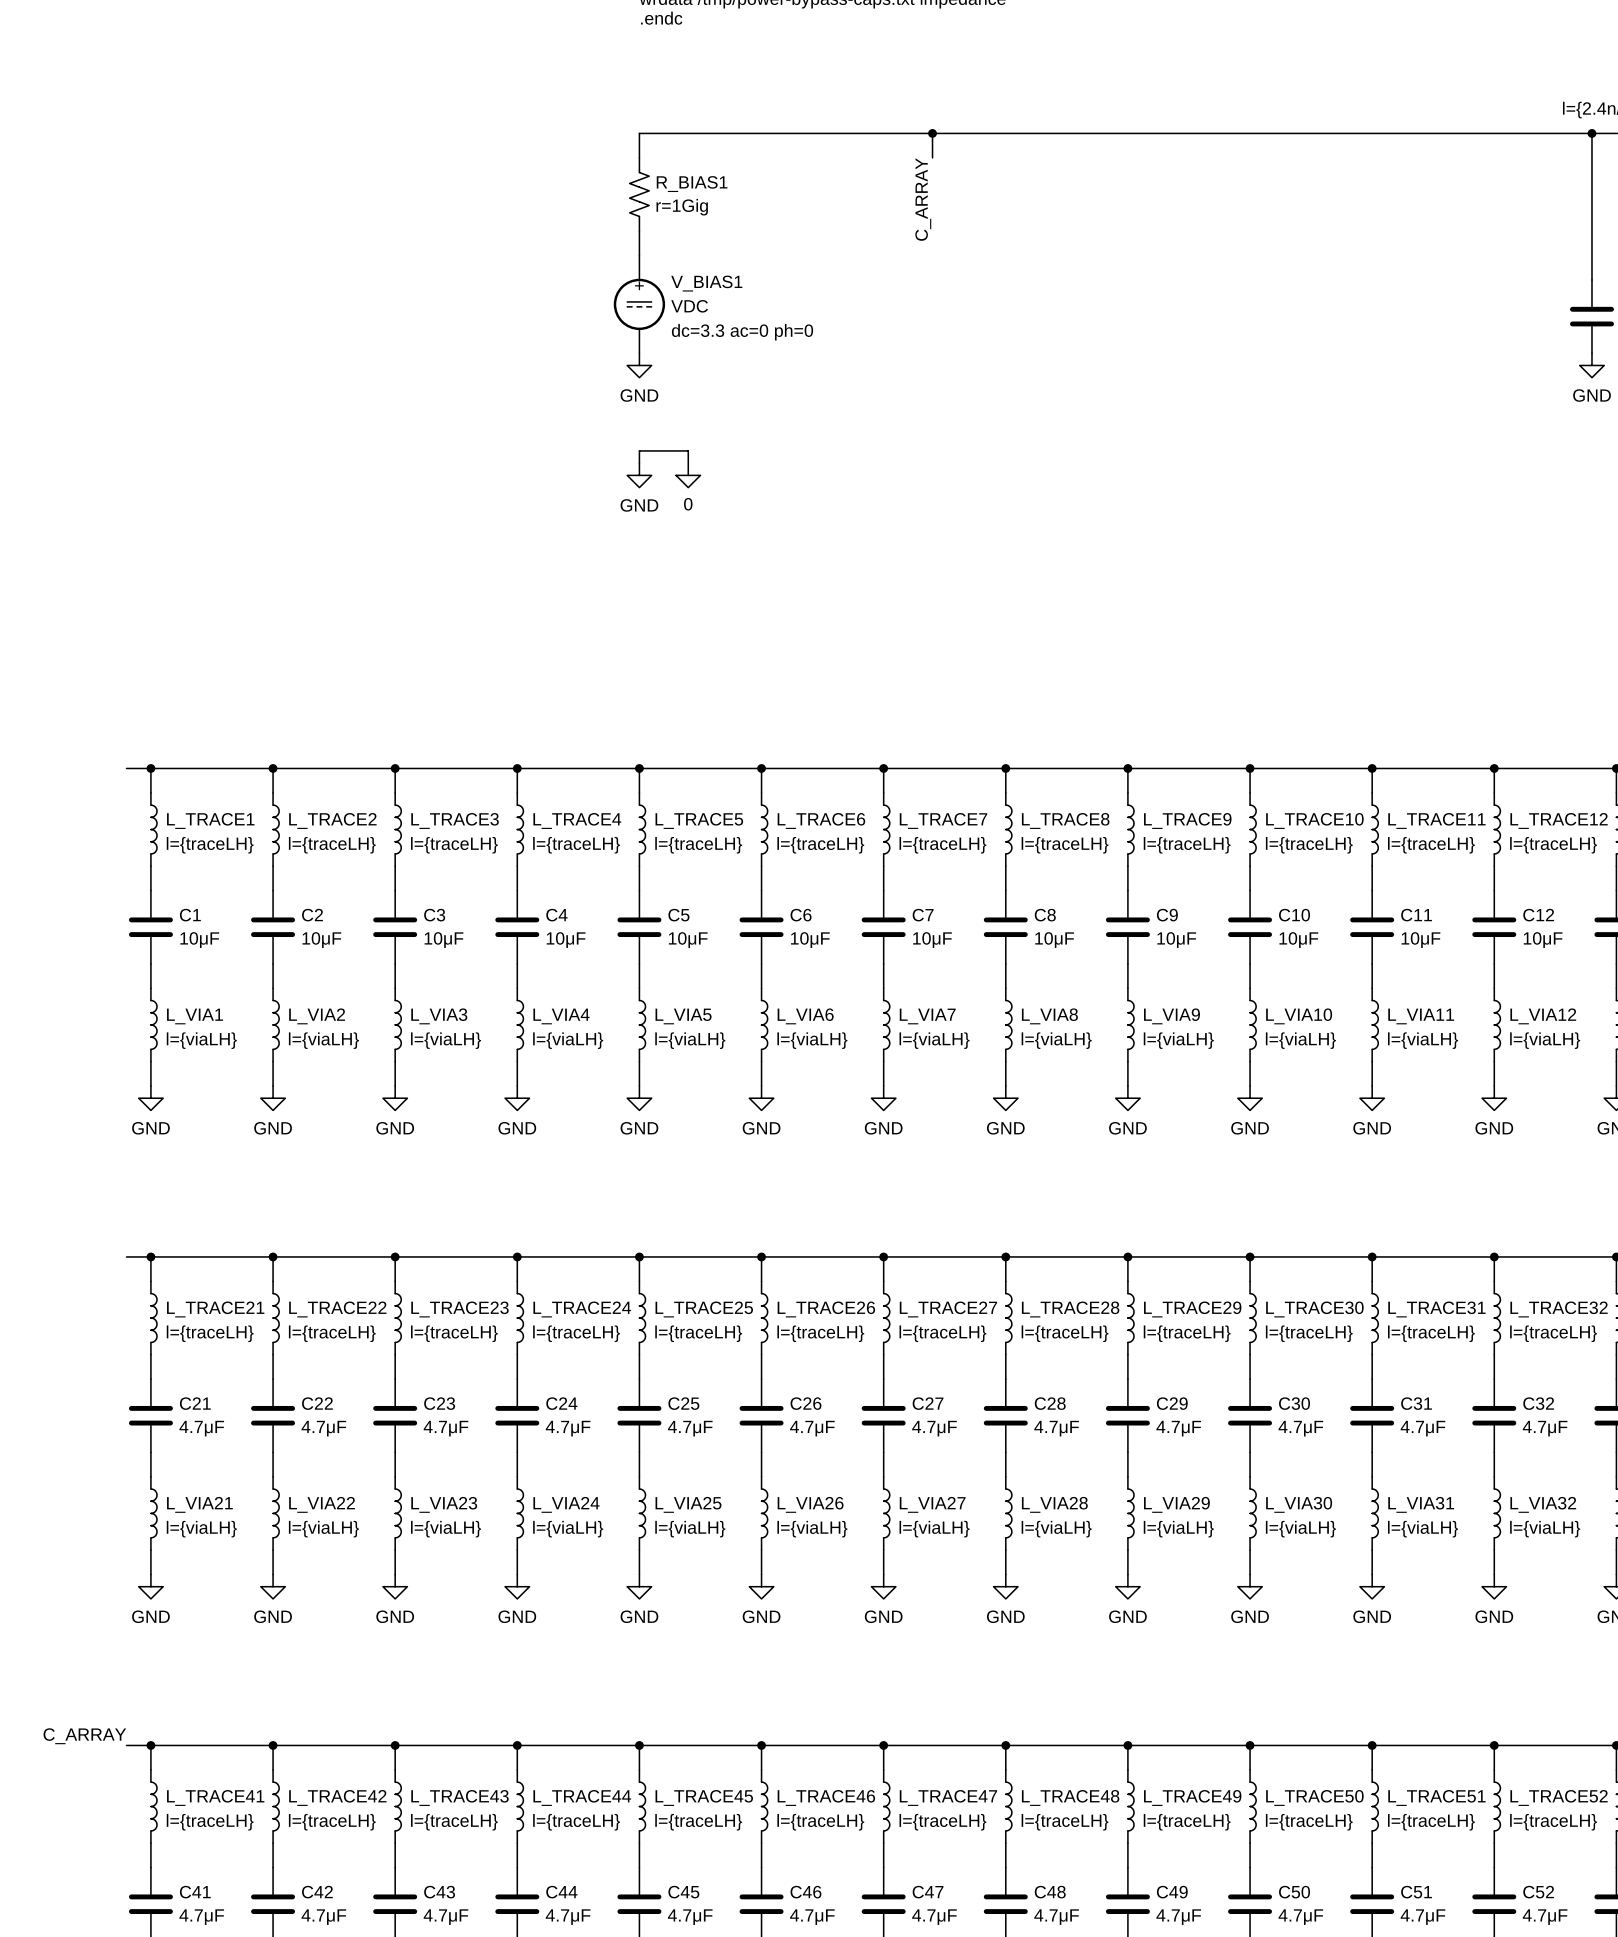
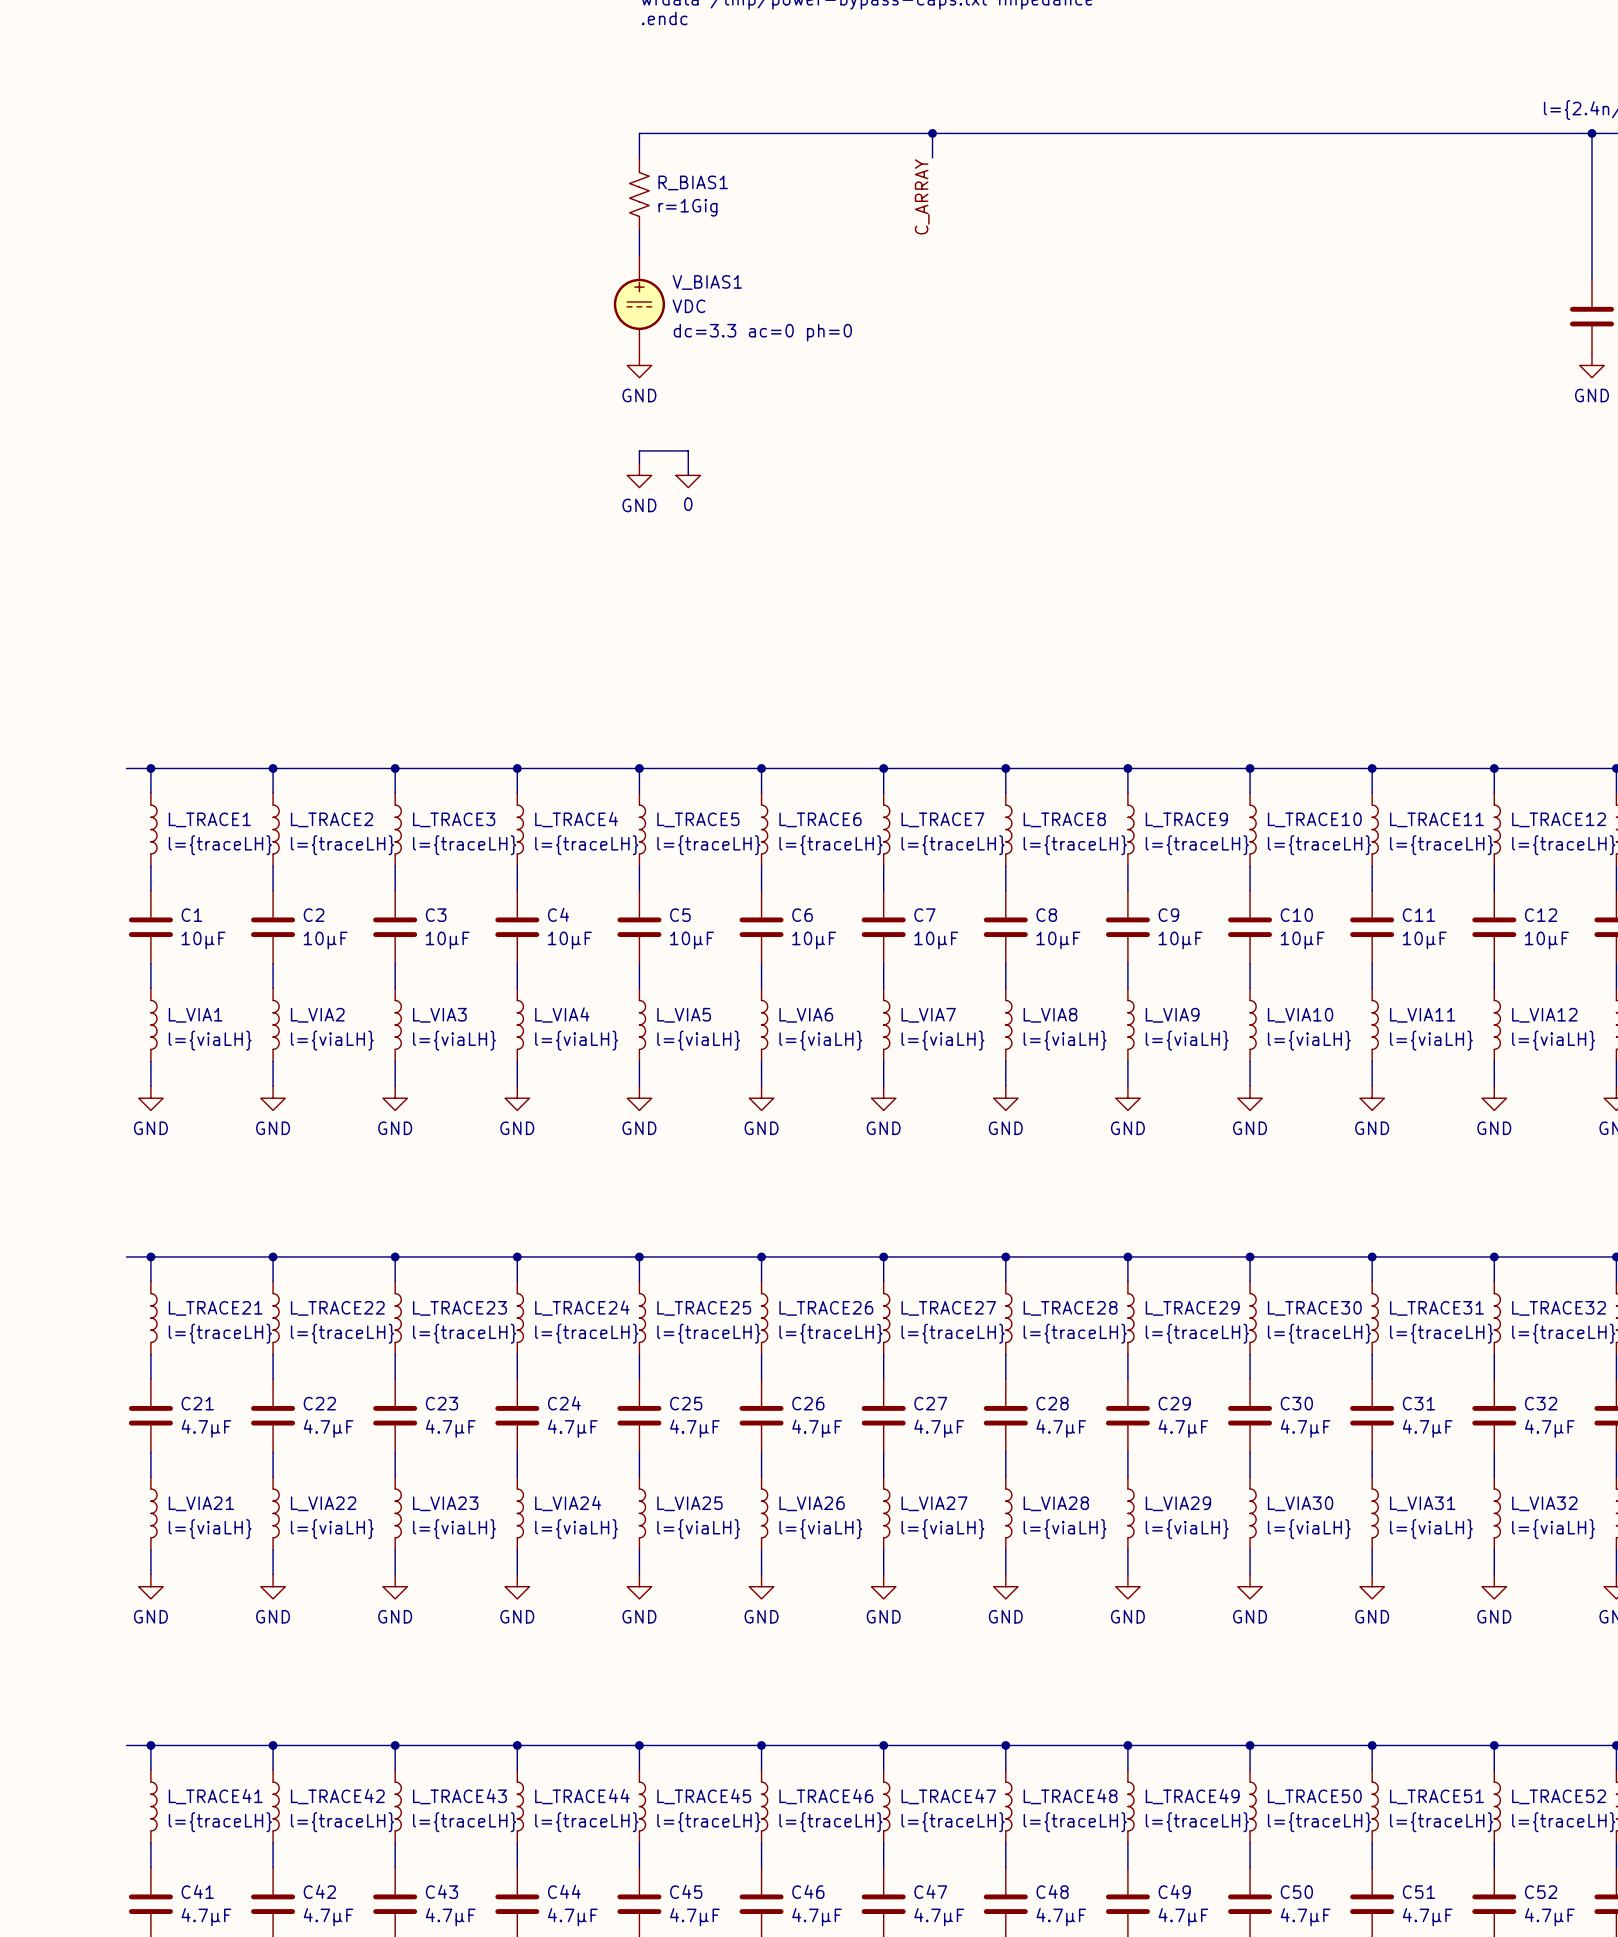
label: C_ARRAY (84, 1736) -> none

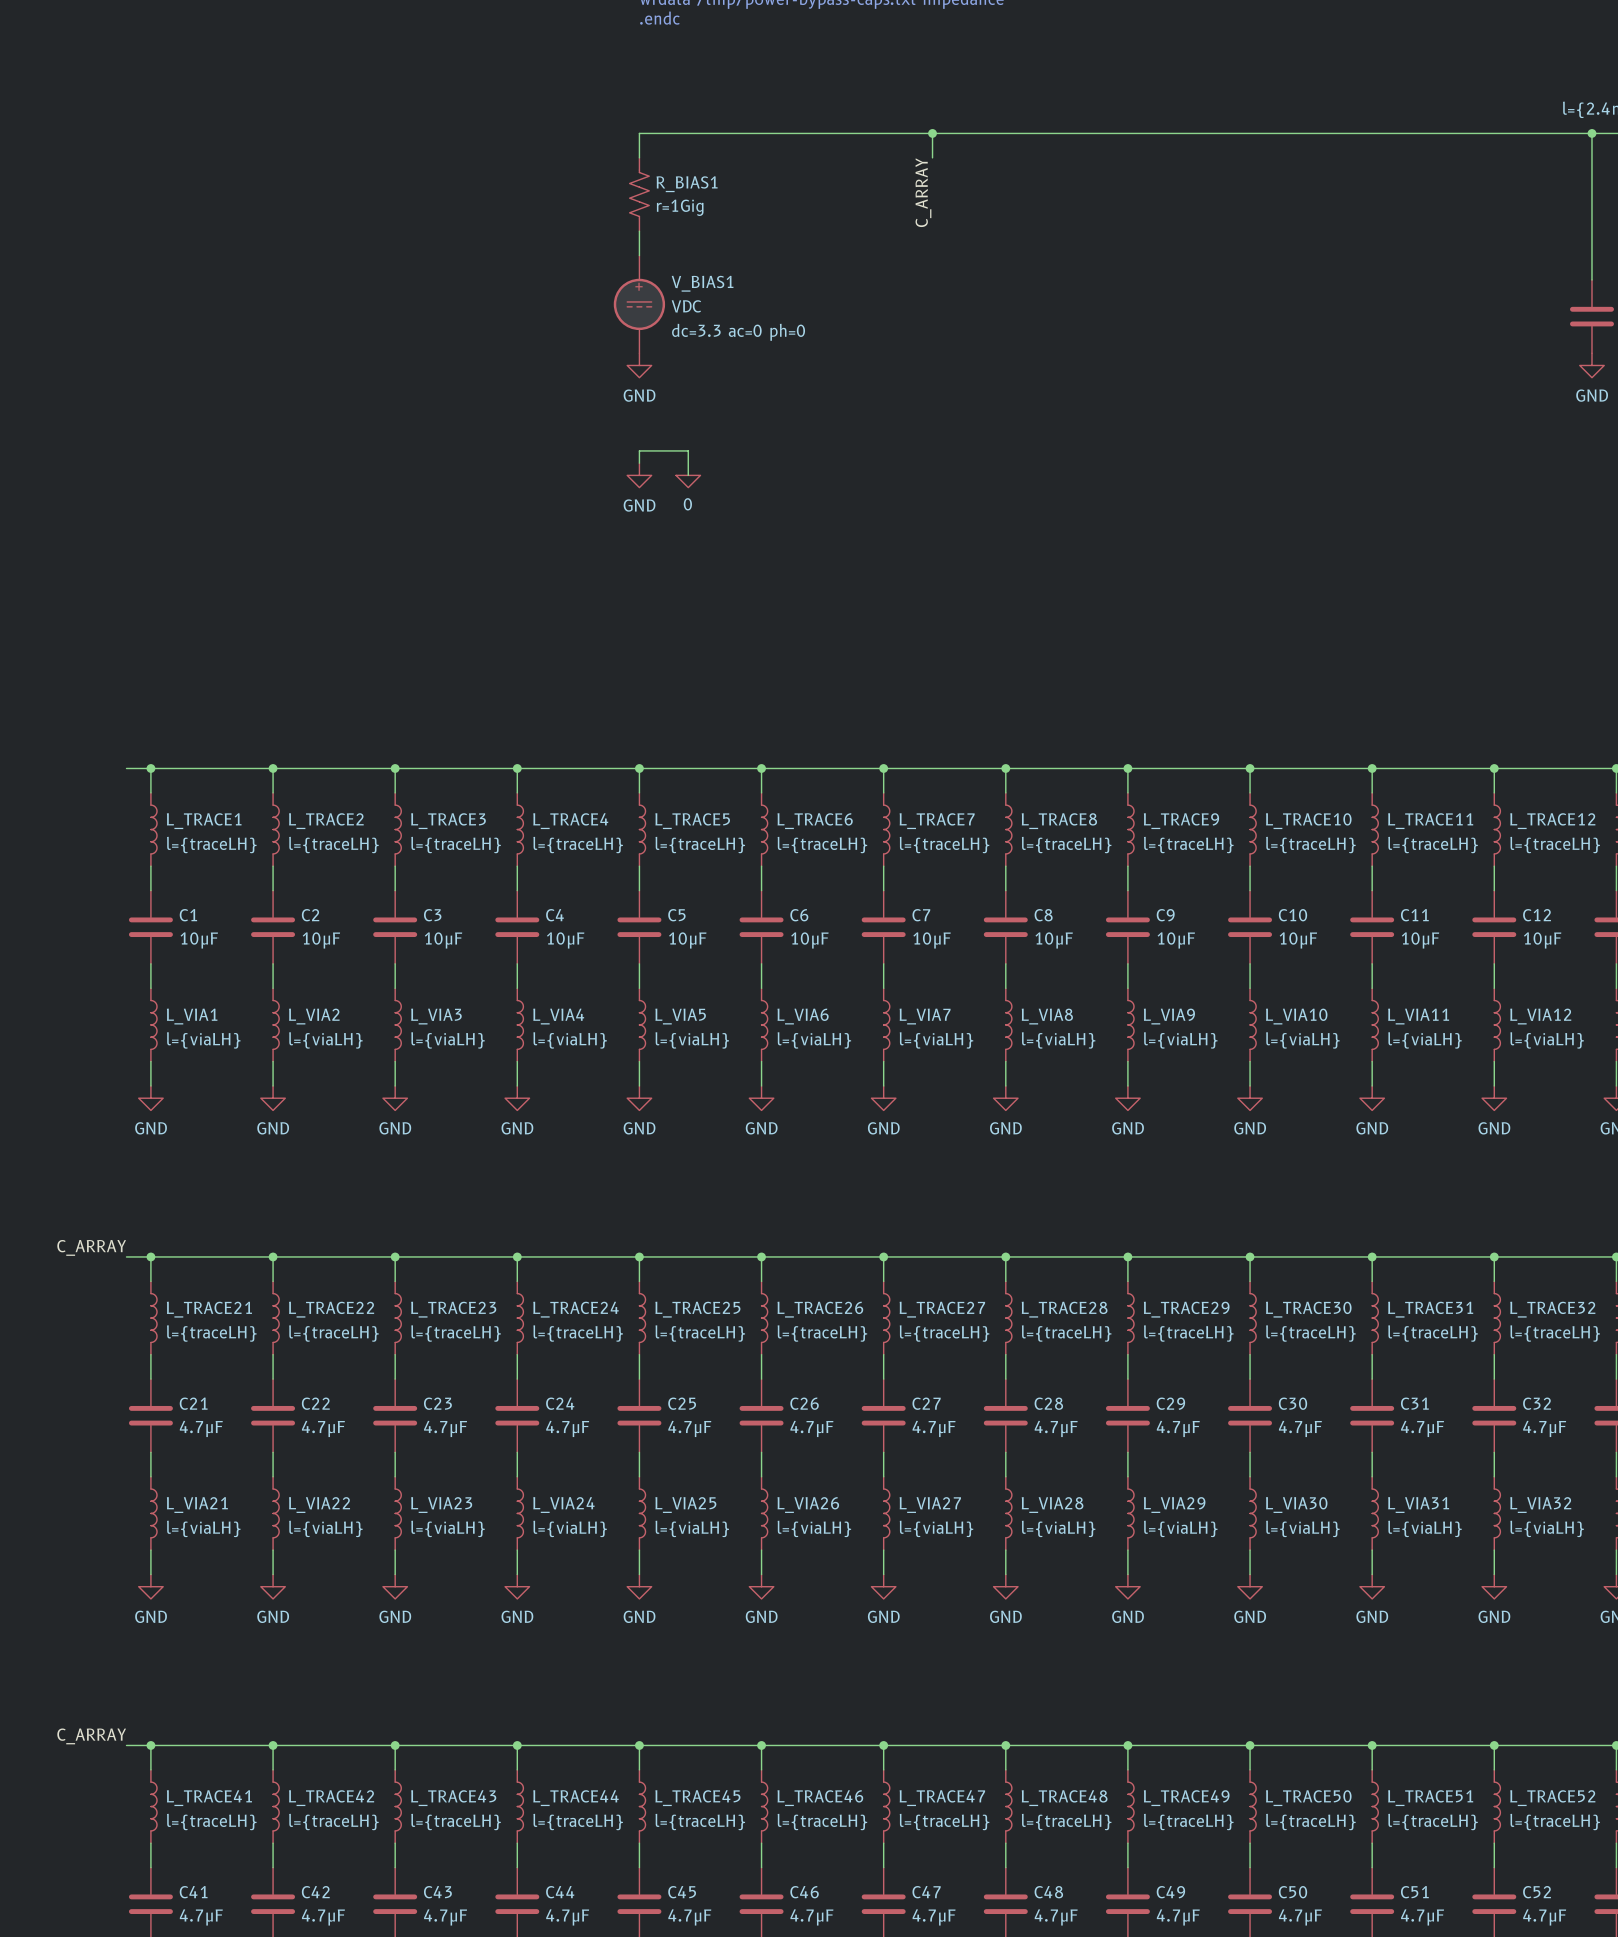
label: none -> C_ARRAY (91, 1247)
label: none -> C_ARRAY (91, 1736)

